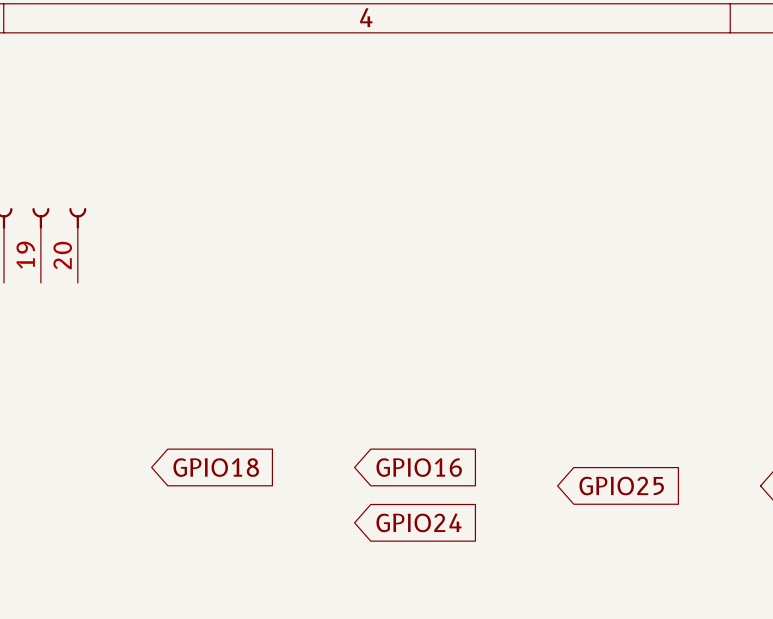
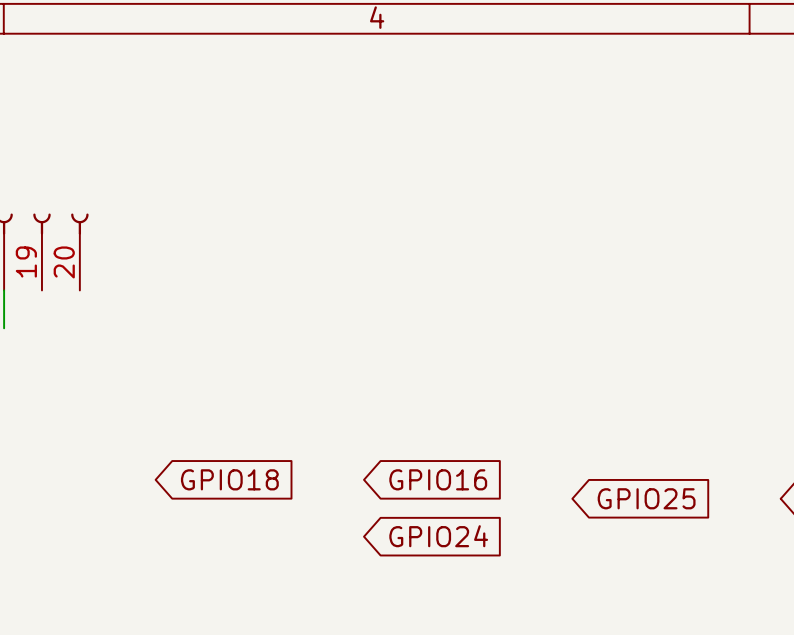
wire: none -> (4, 290) (4, 328)

